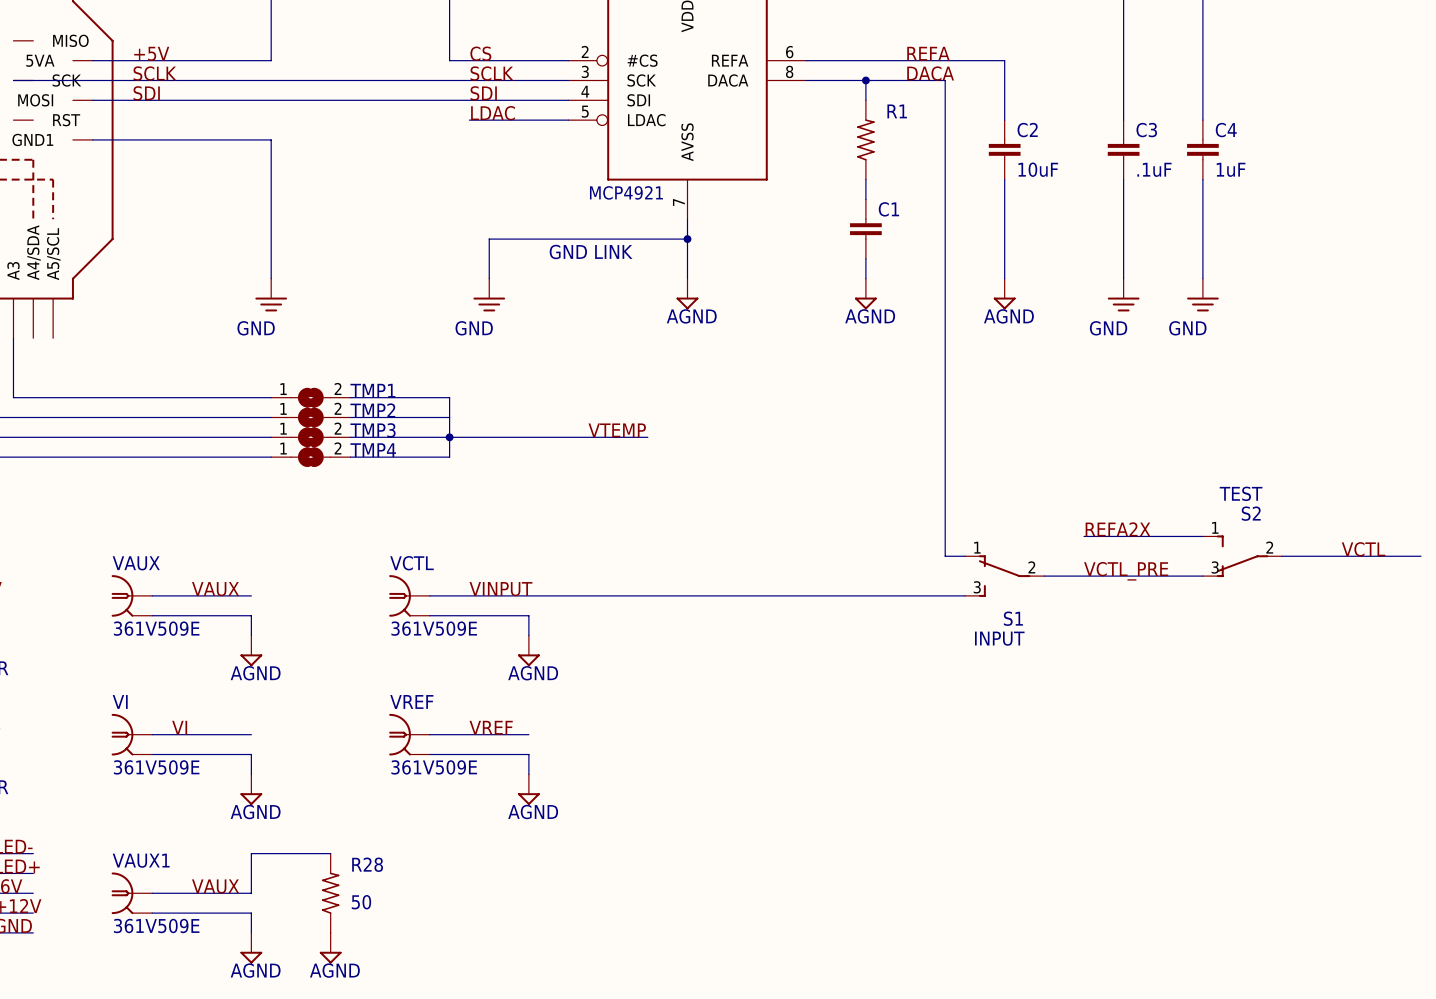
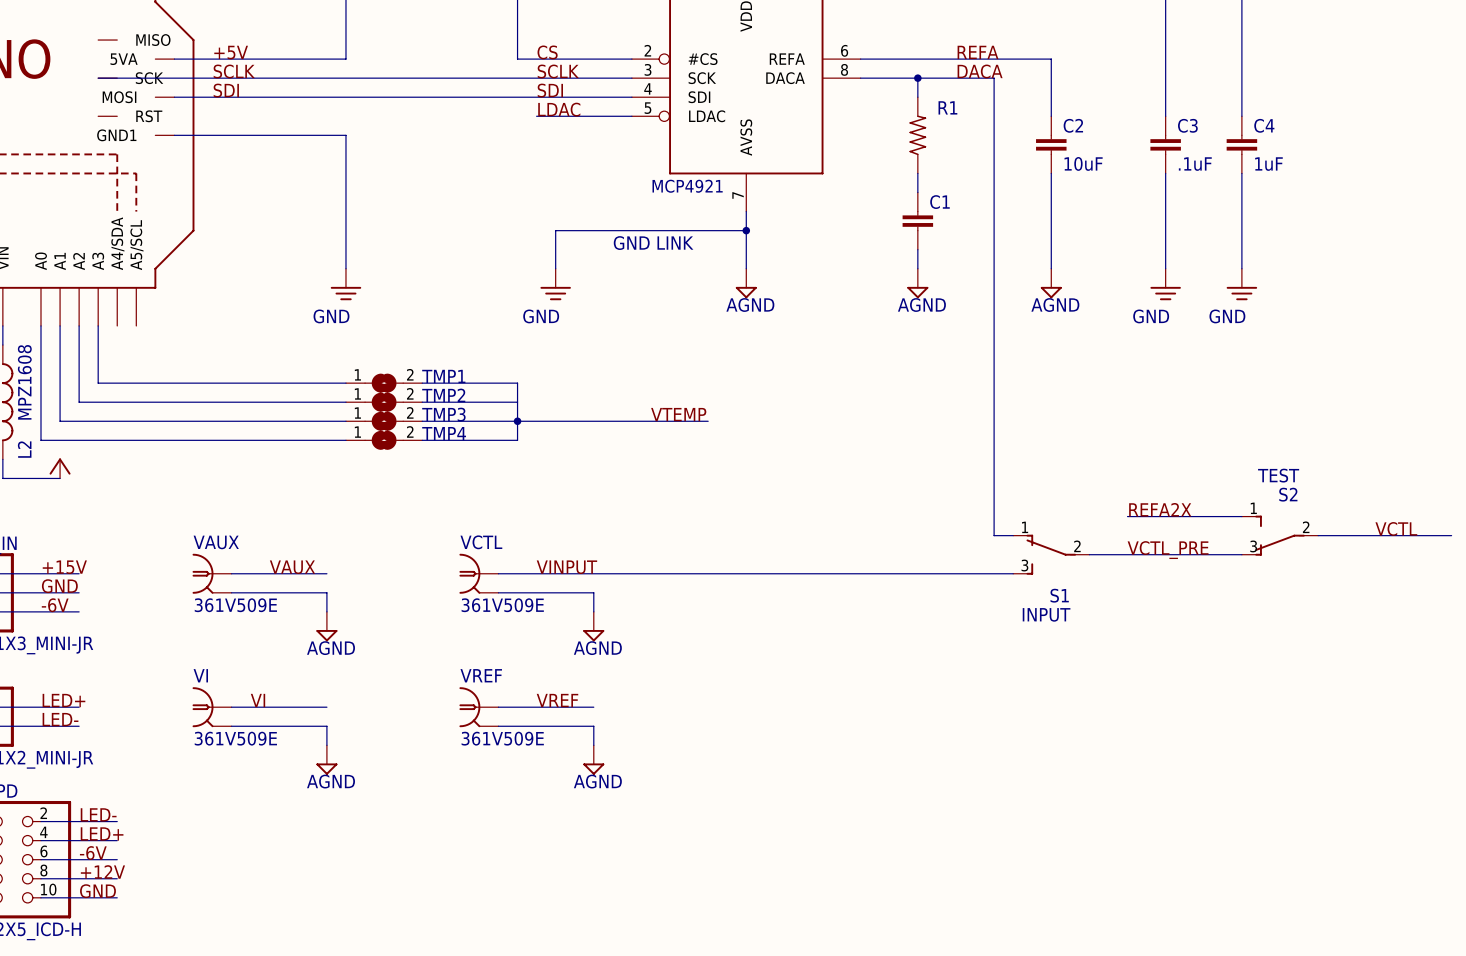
wire: (330, 853) (251, 853) (251, 893) (152, 893) -> none
label: VAUX (215, 886) -> none
VAUX1: 361V509E (131, 893) -> none
R28: 50 (330, 893) -> none
wire: (152, 913) (251, 913) (251, 932) -> none
power symbol: AGND (251, 948) -> none
power symbol: AGND (330, 948) -> none

